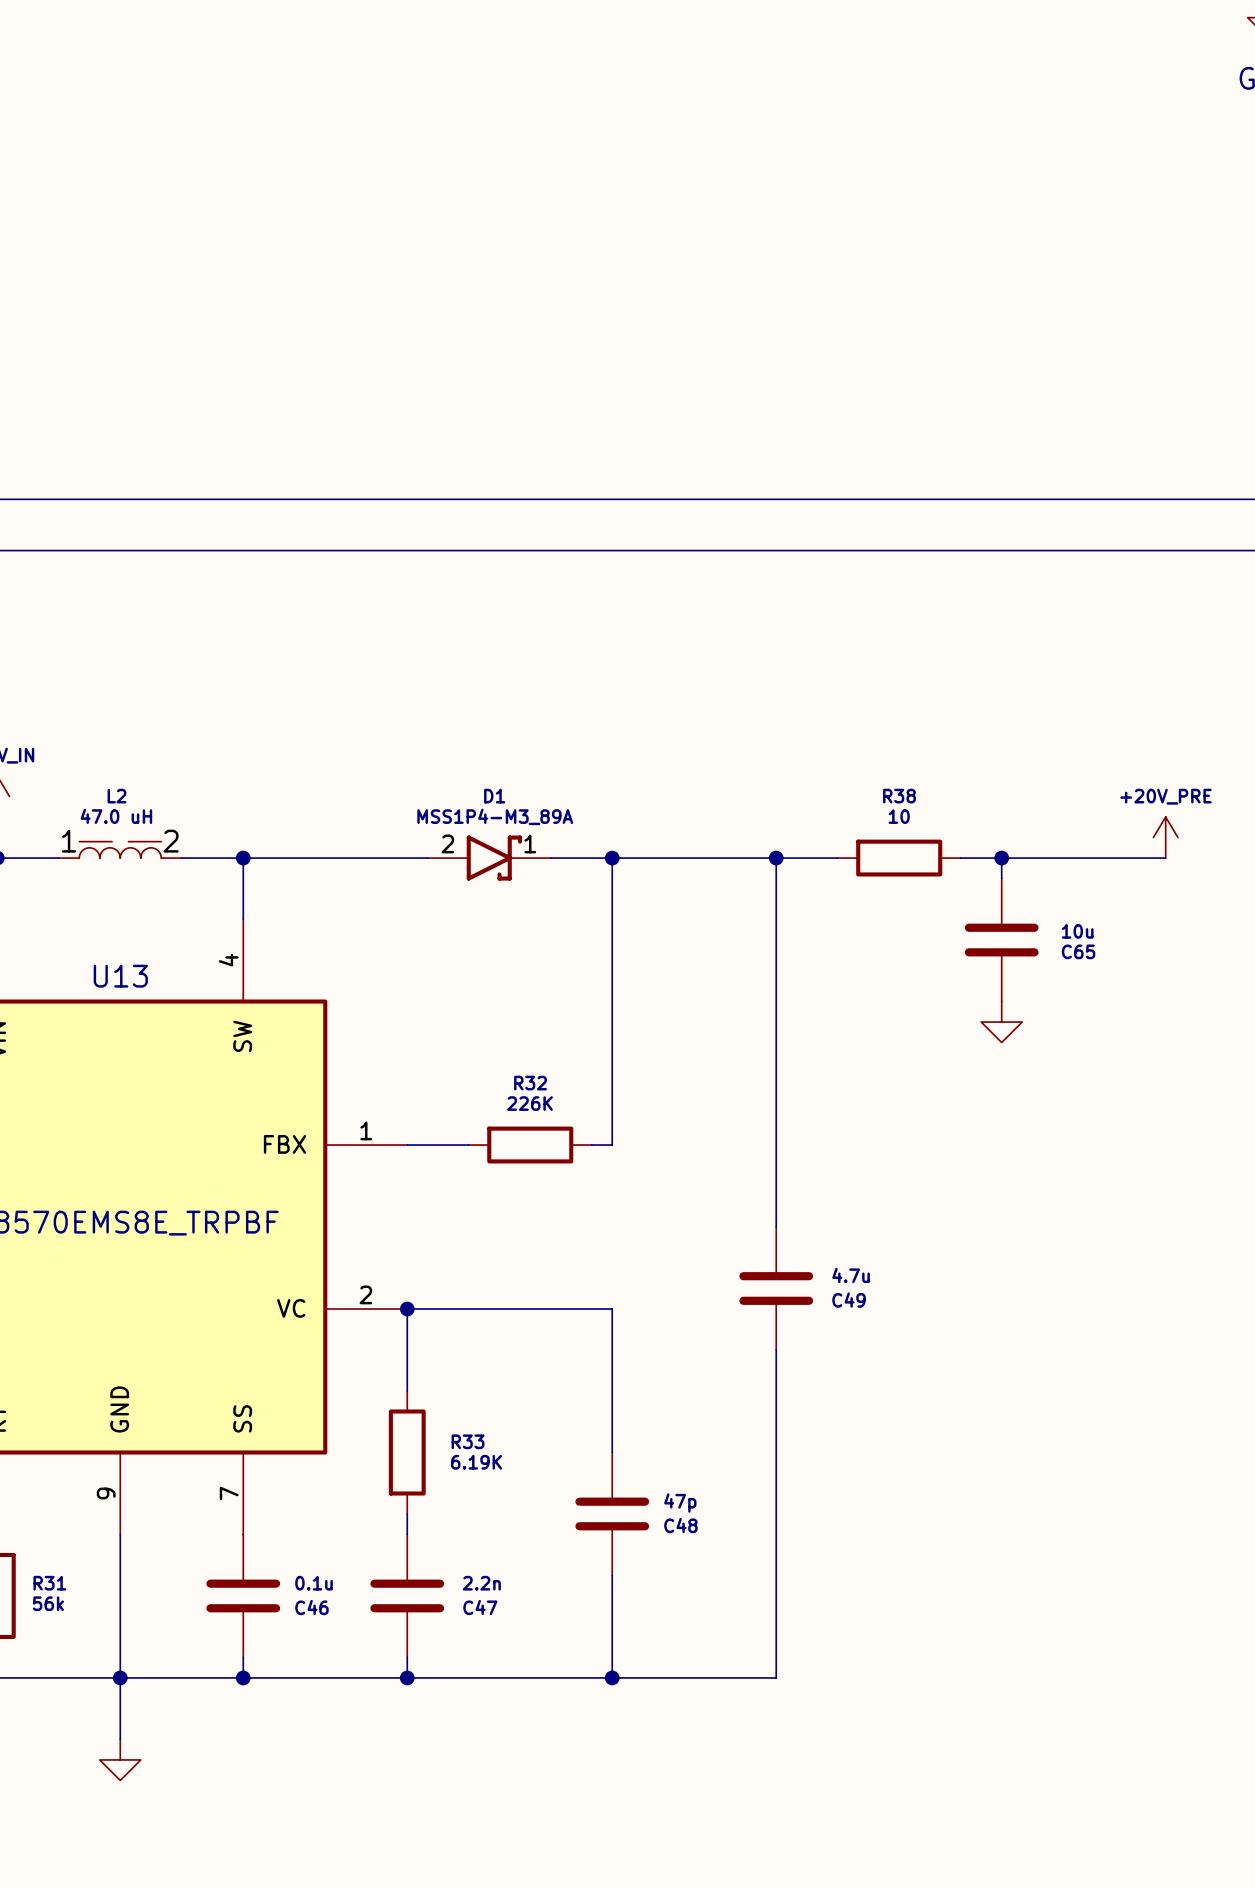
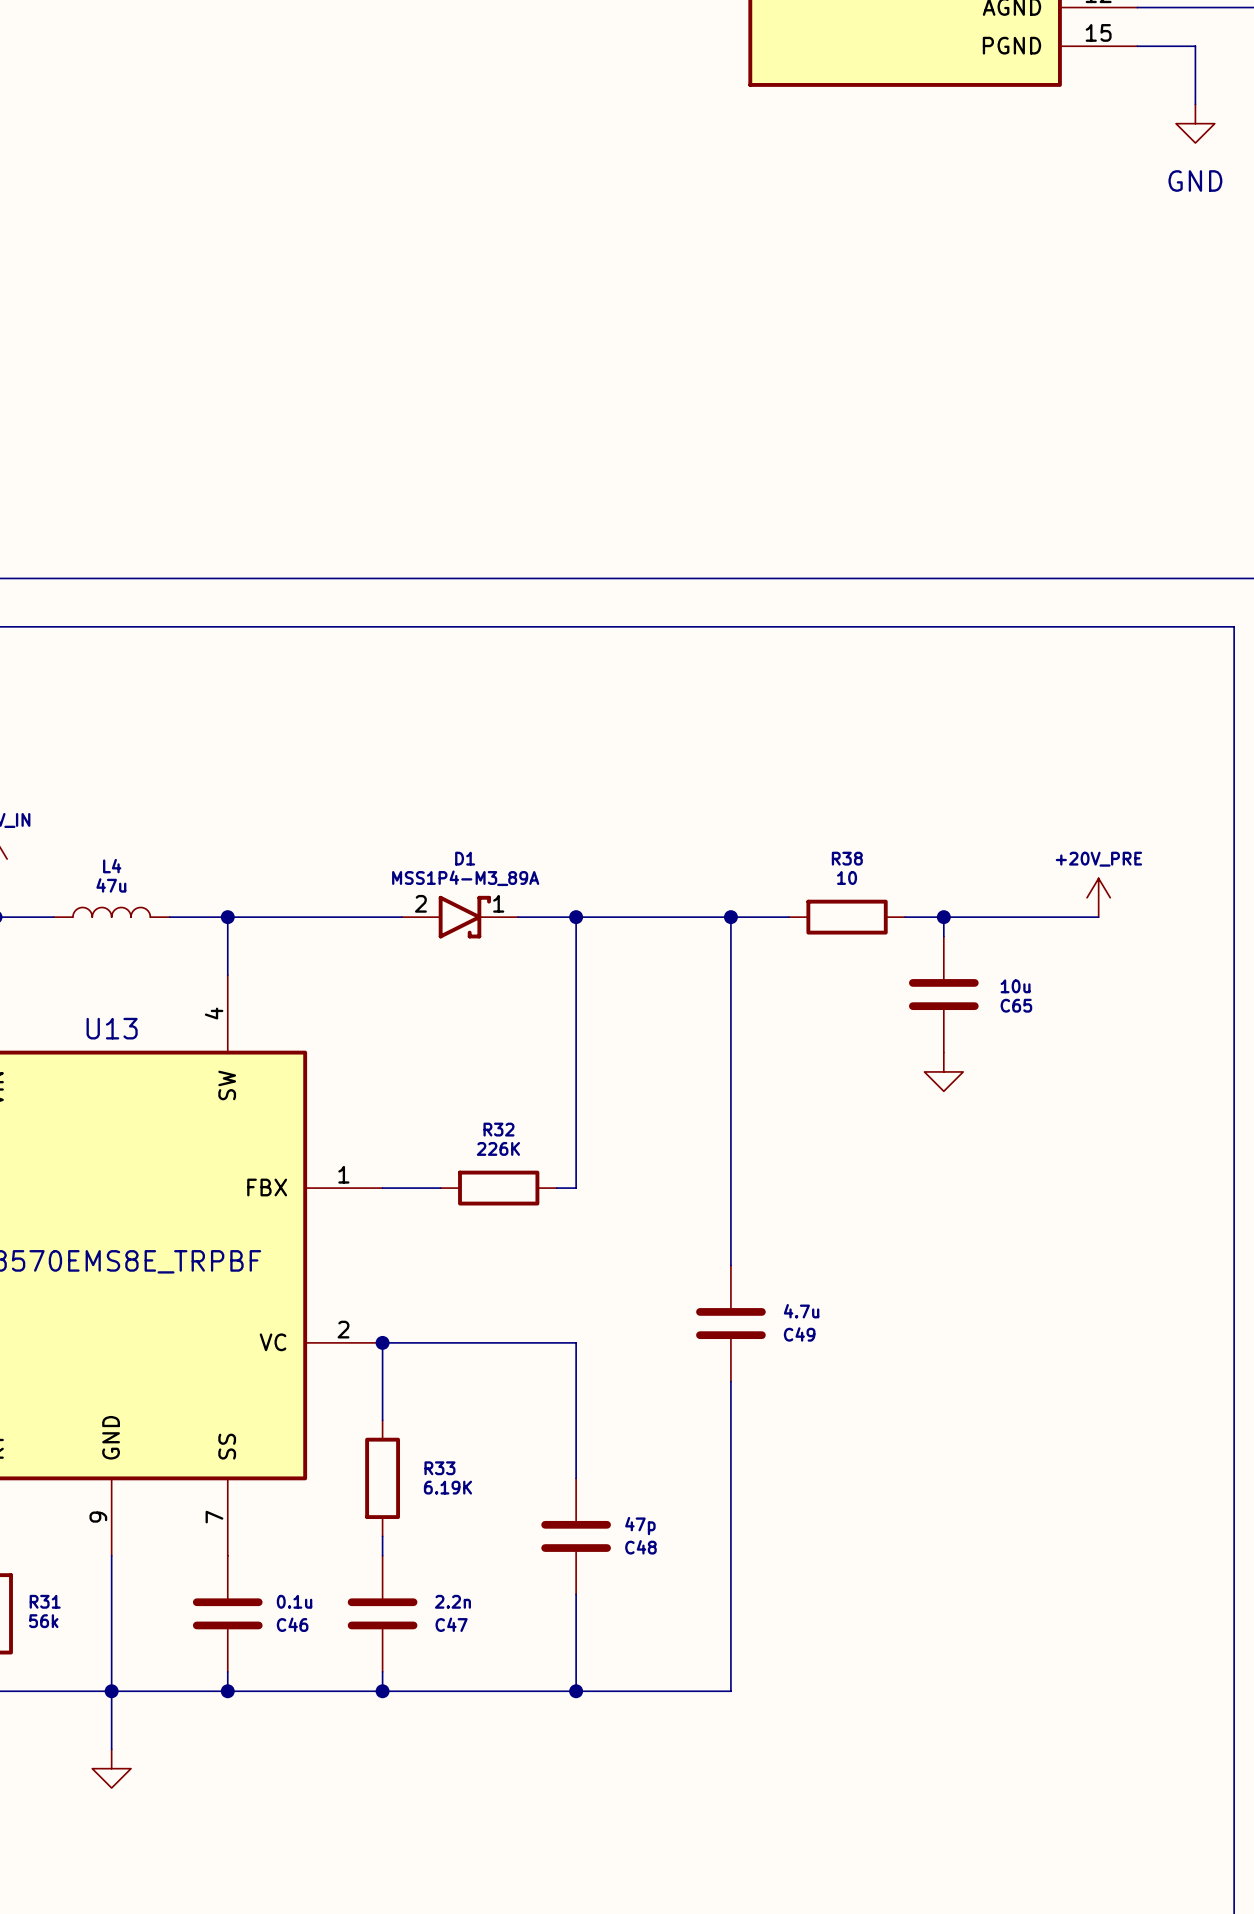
L2: (120, 849) -> none
L4: none -> 47u (111, 912)

